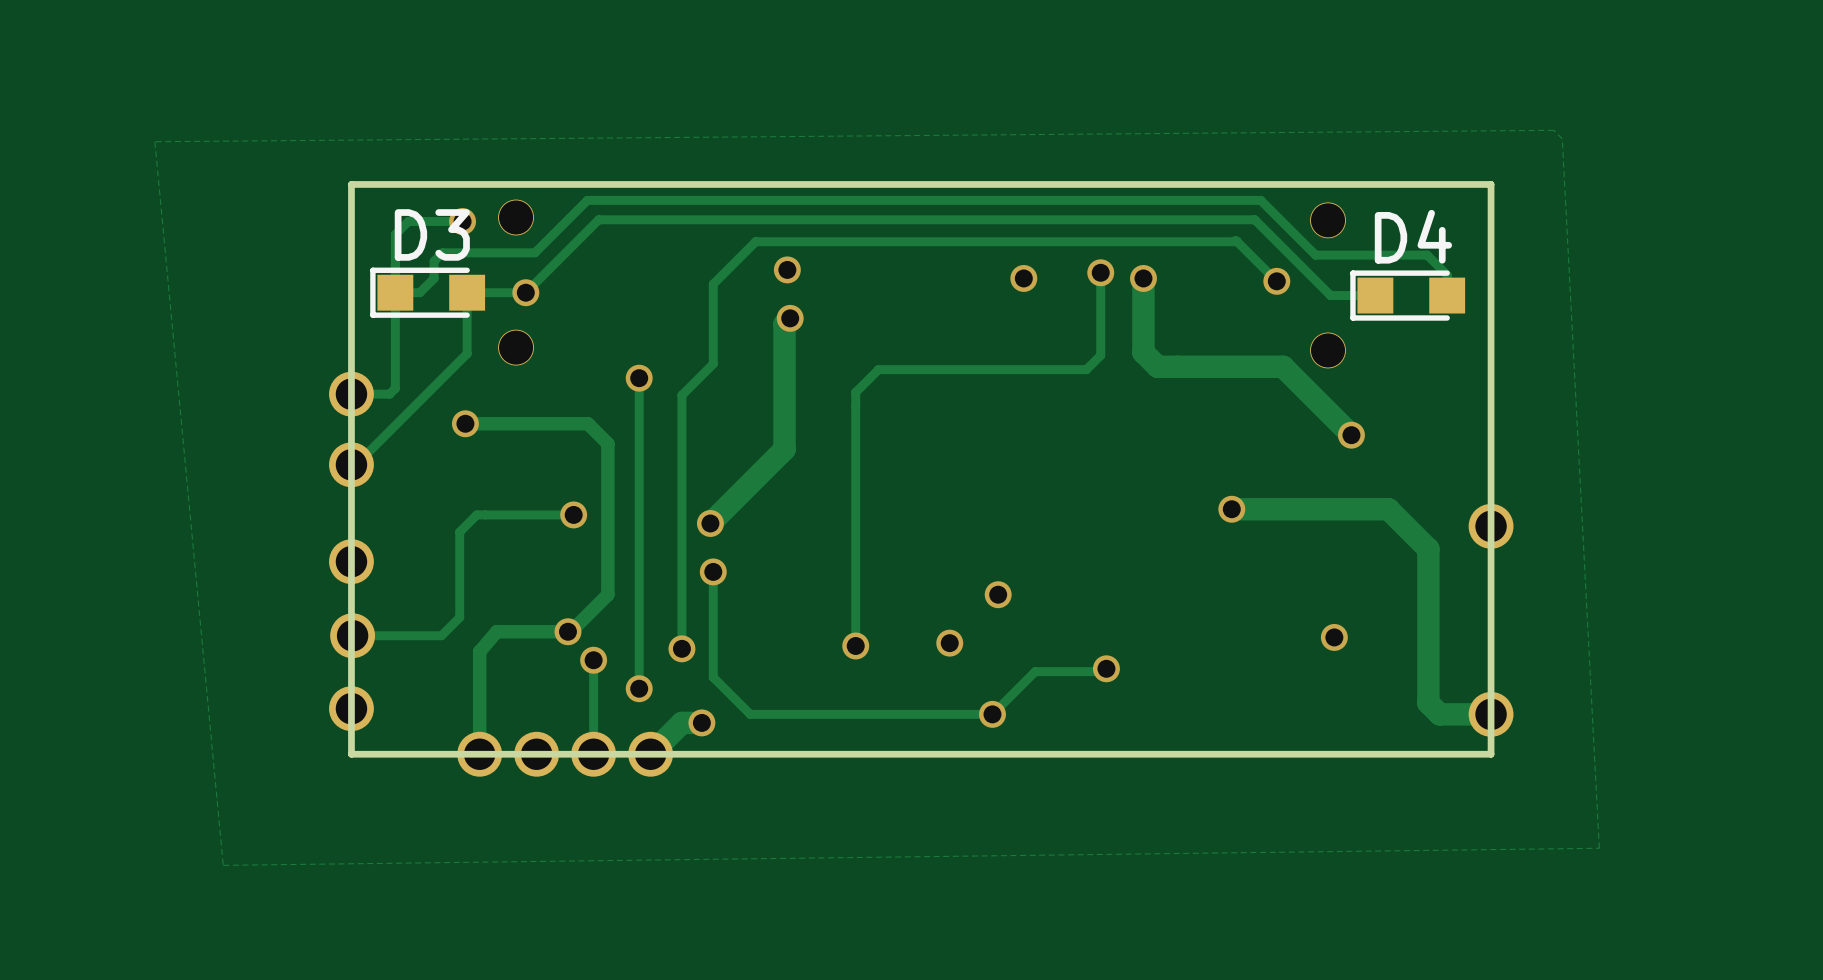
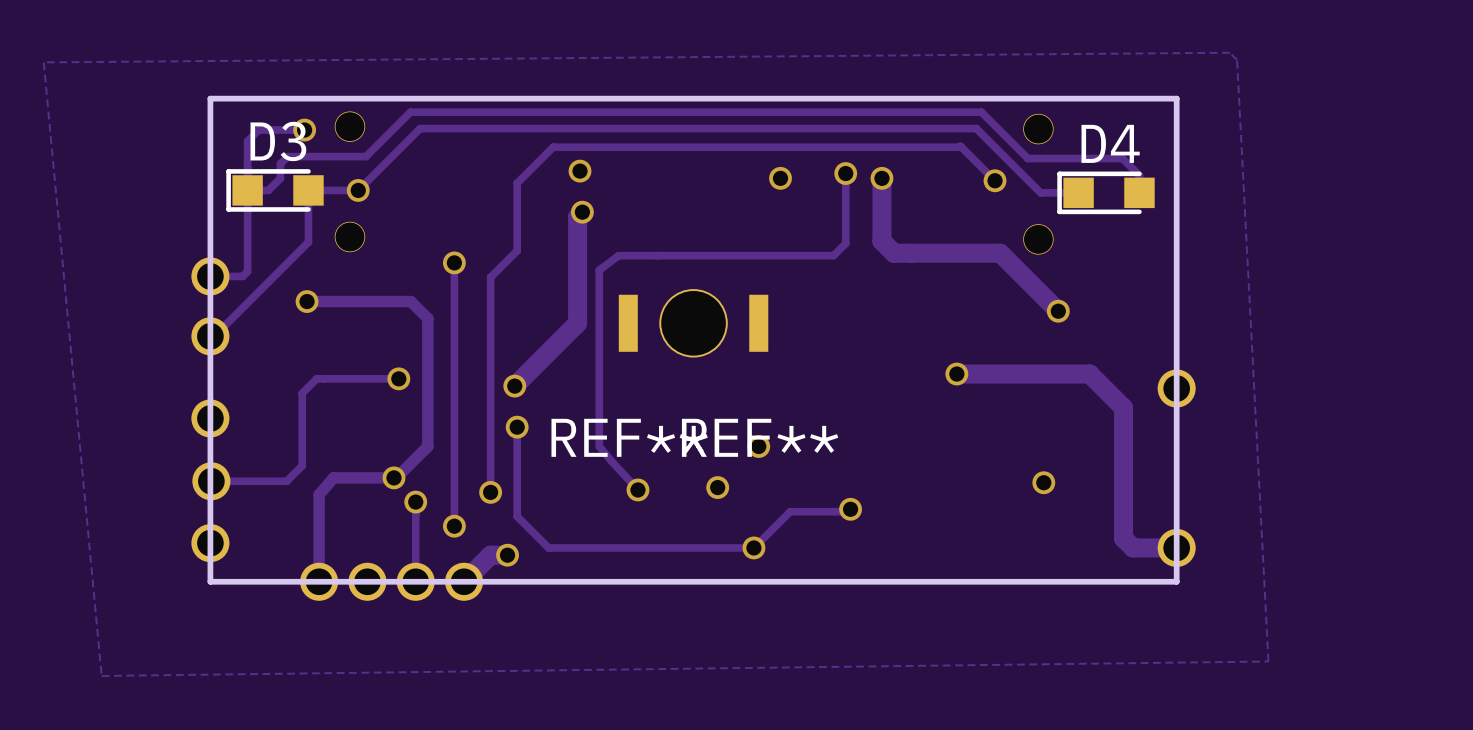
track: (878, 369) (855, 392) (855, 645) -> (657, 255) (618, 255) (599, 270) (599, 446) (637, 489)
REF**: none -> (628, 323)
part: none -> (693, 323)
REF**: none -> (758, 323)

